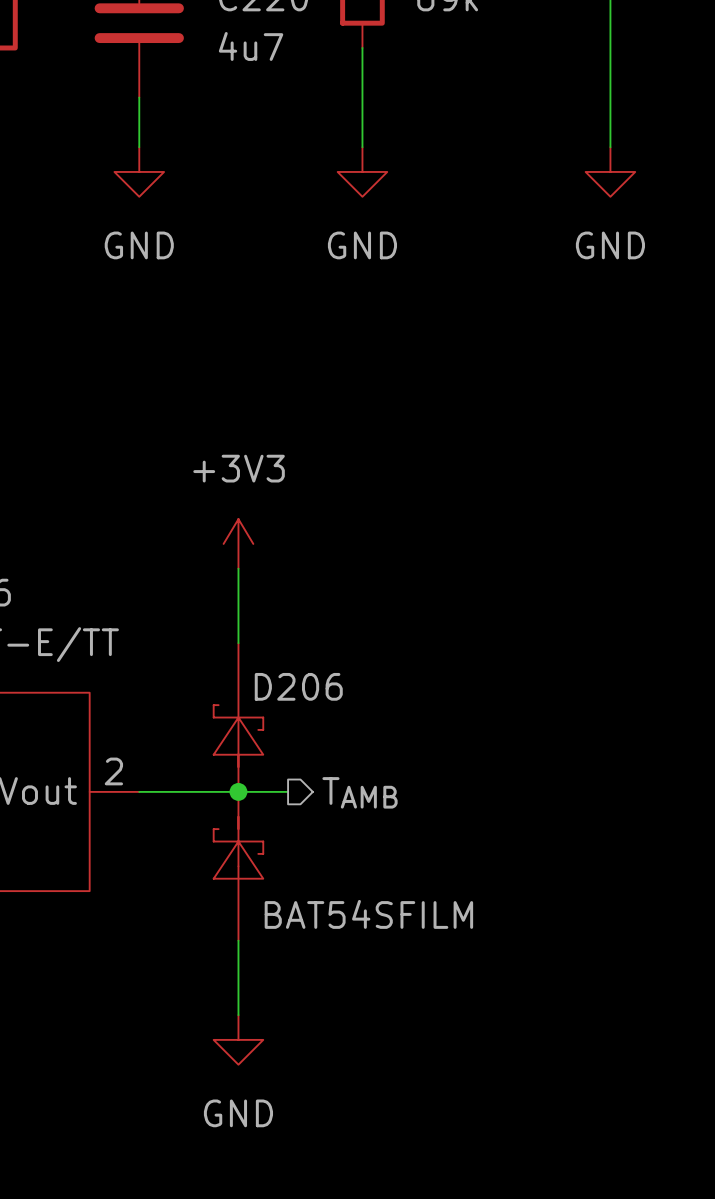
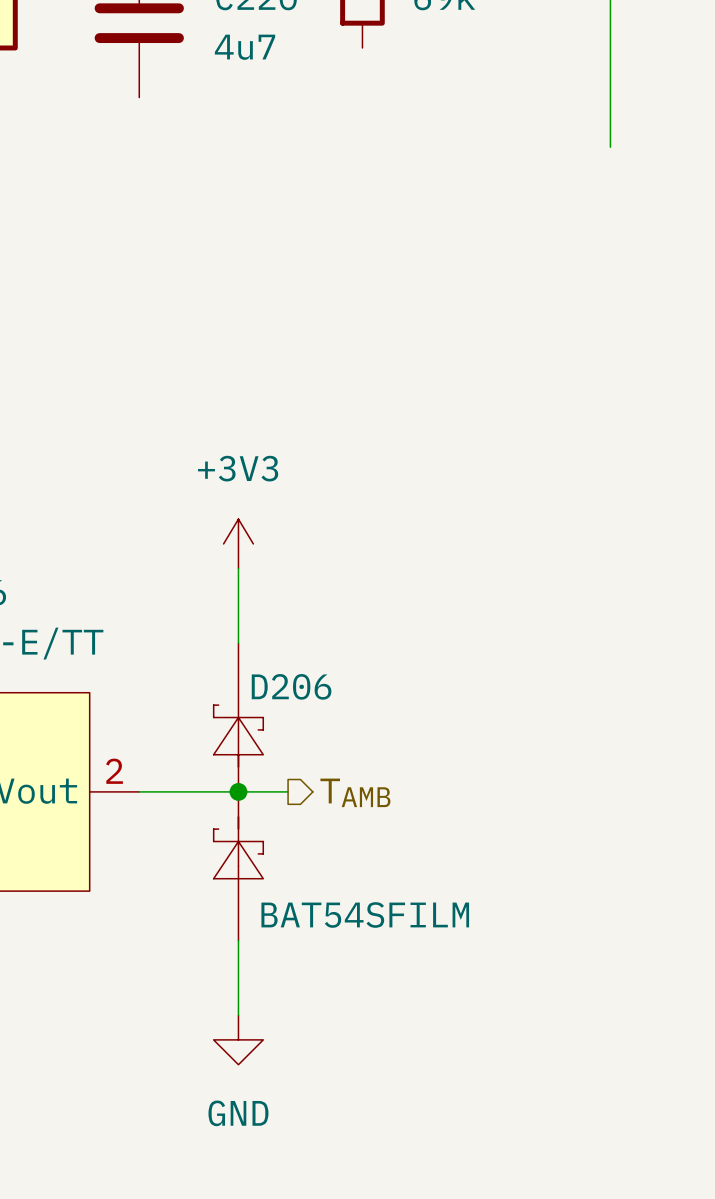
wire: (362, 47) (362, 147) -> none
wire: (139, 97) (139, 147) -> none
power symbol: GND (139, 171) -> none
power symbol: GND (362, 171) -> none
power symbol: GND (610, 171) -> none

